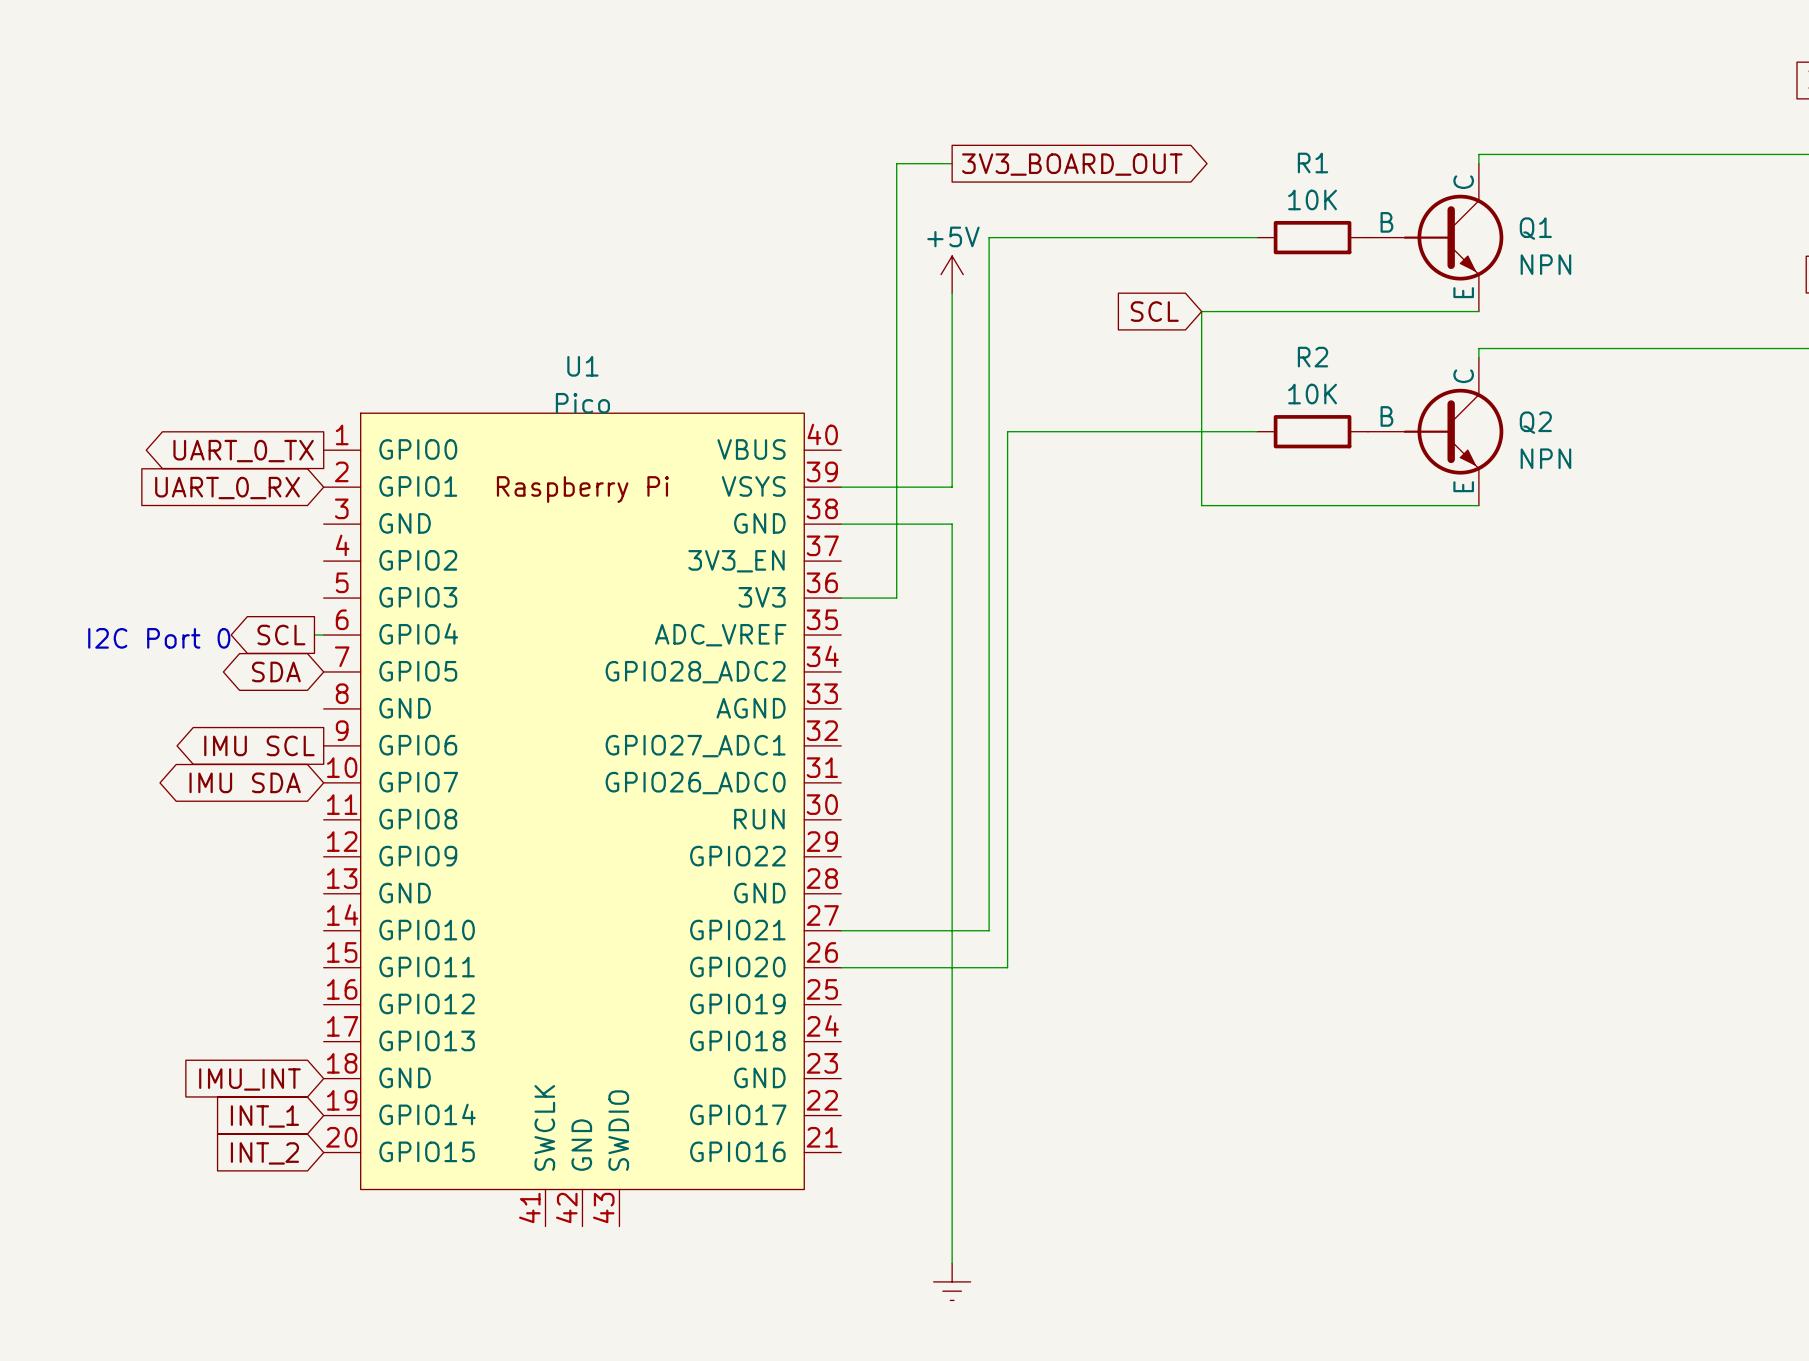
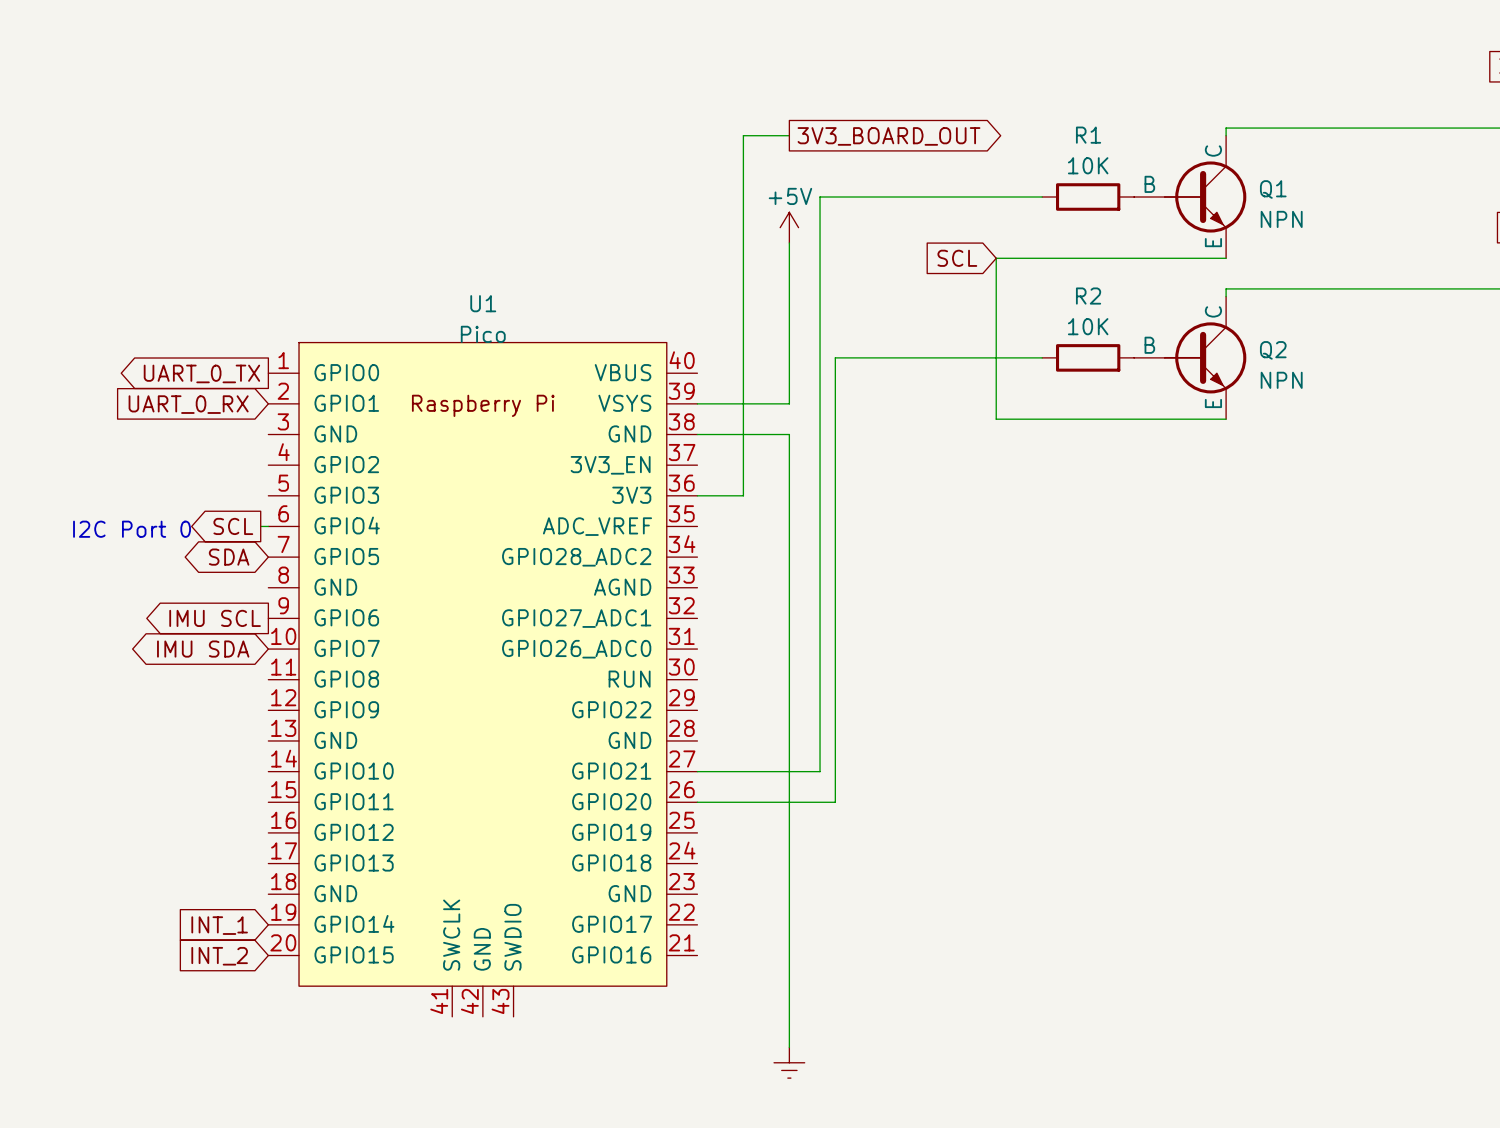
global label: IMU_INT (249, 1079) -> none

